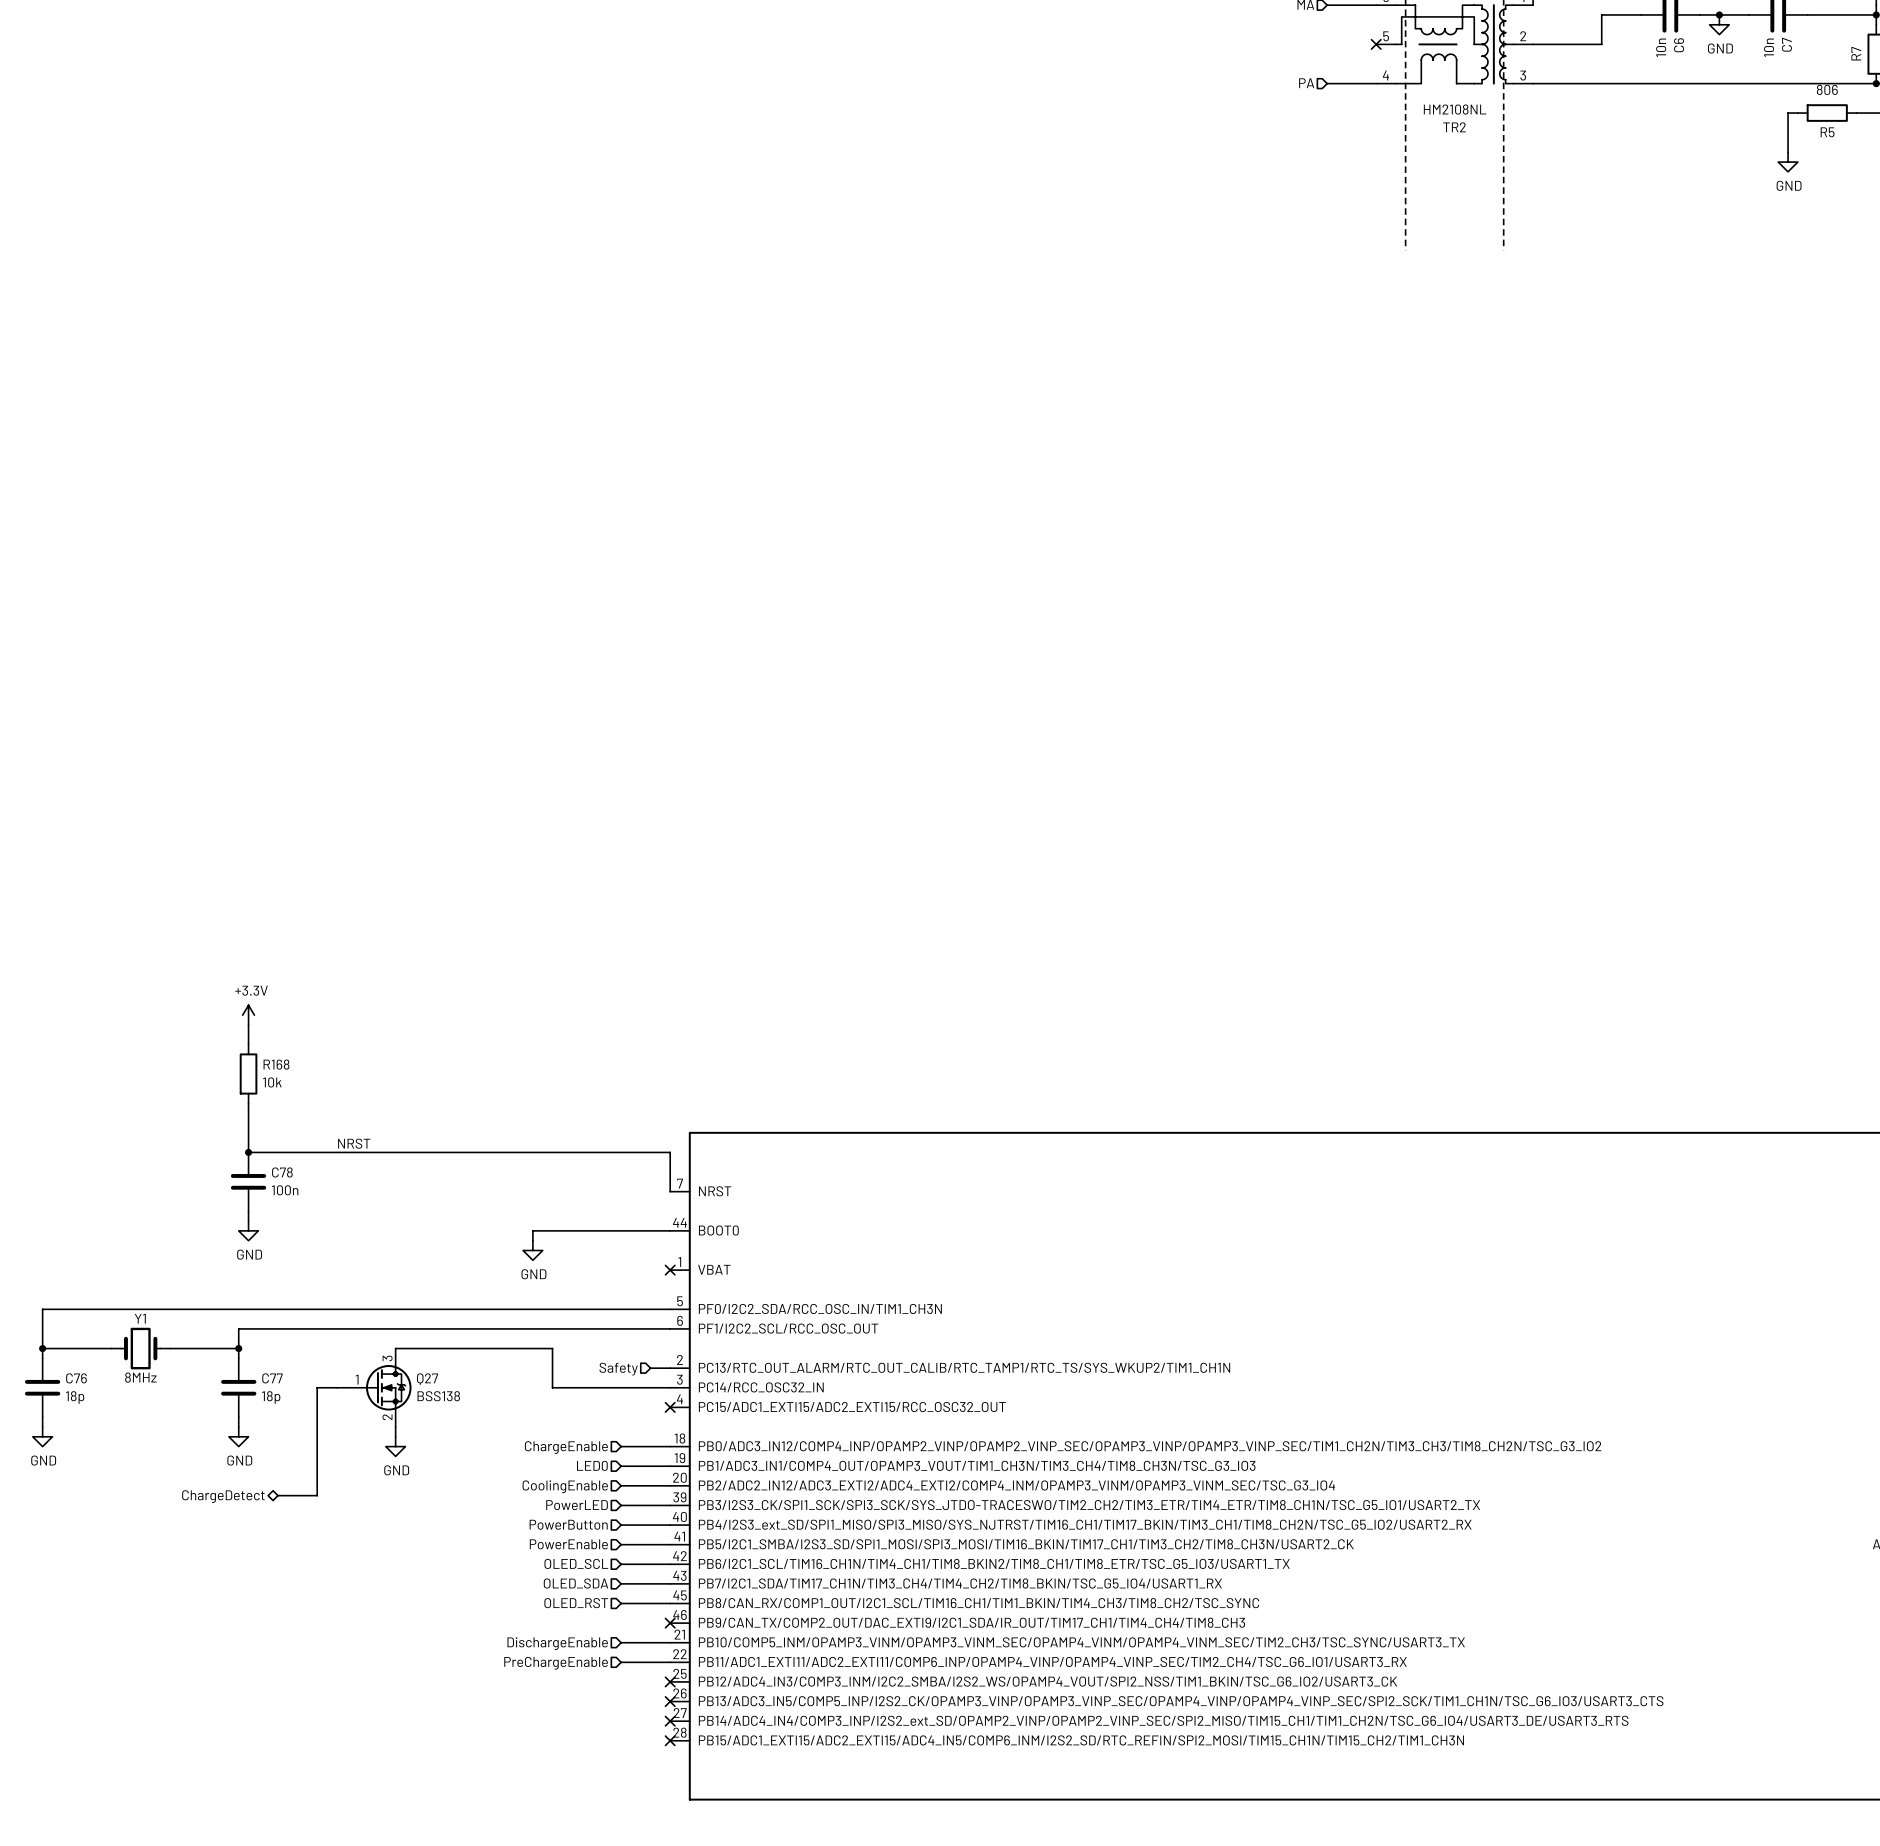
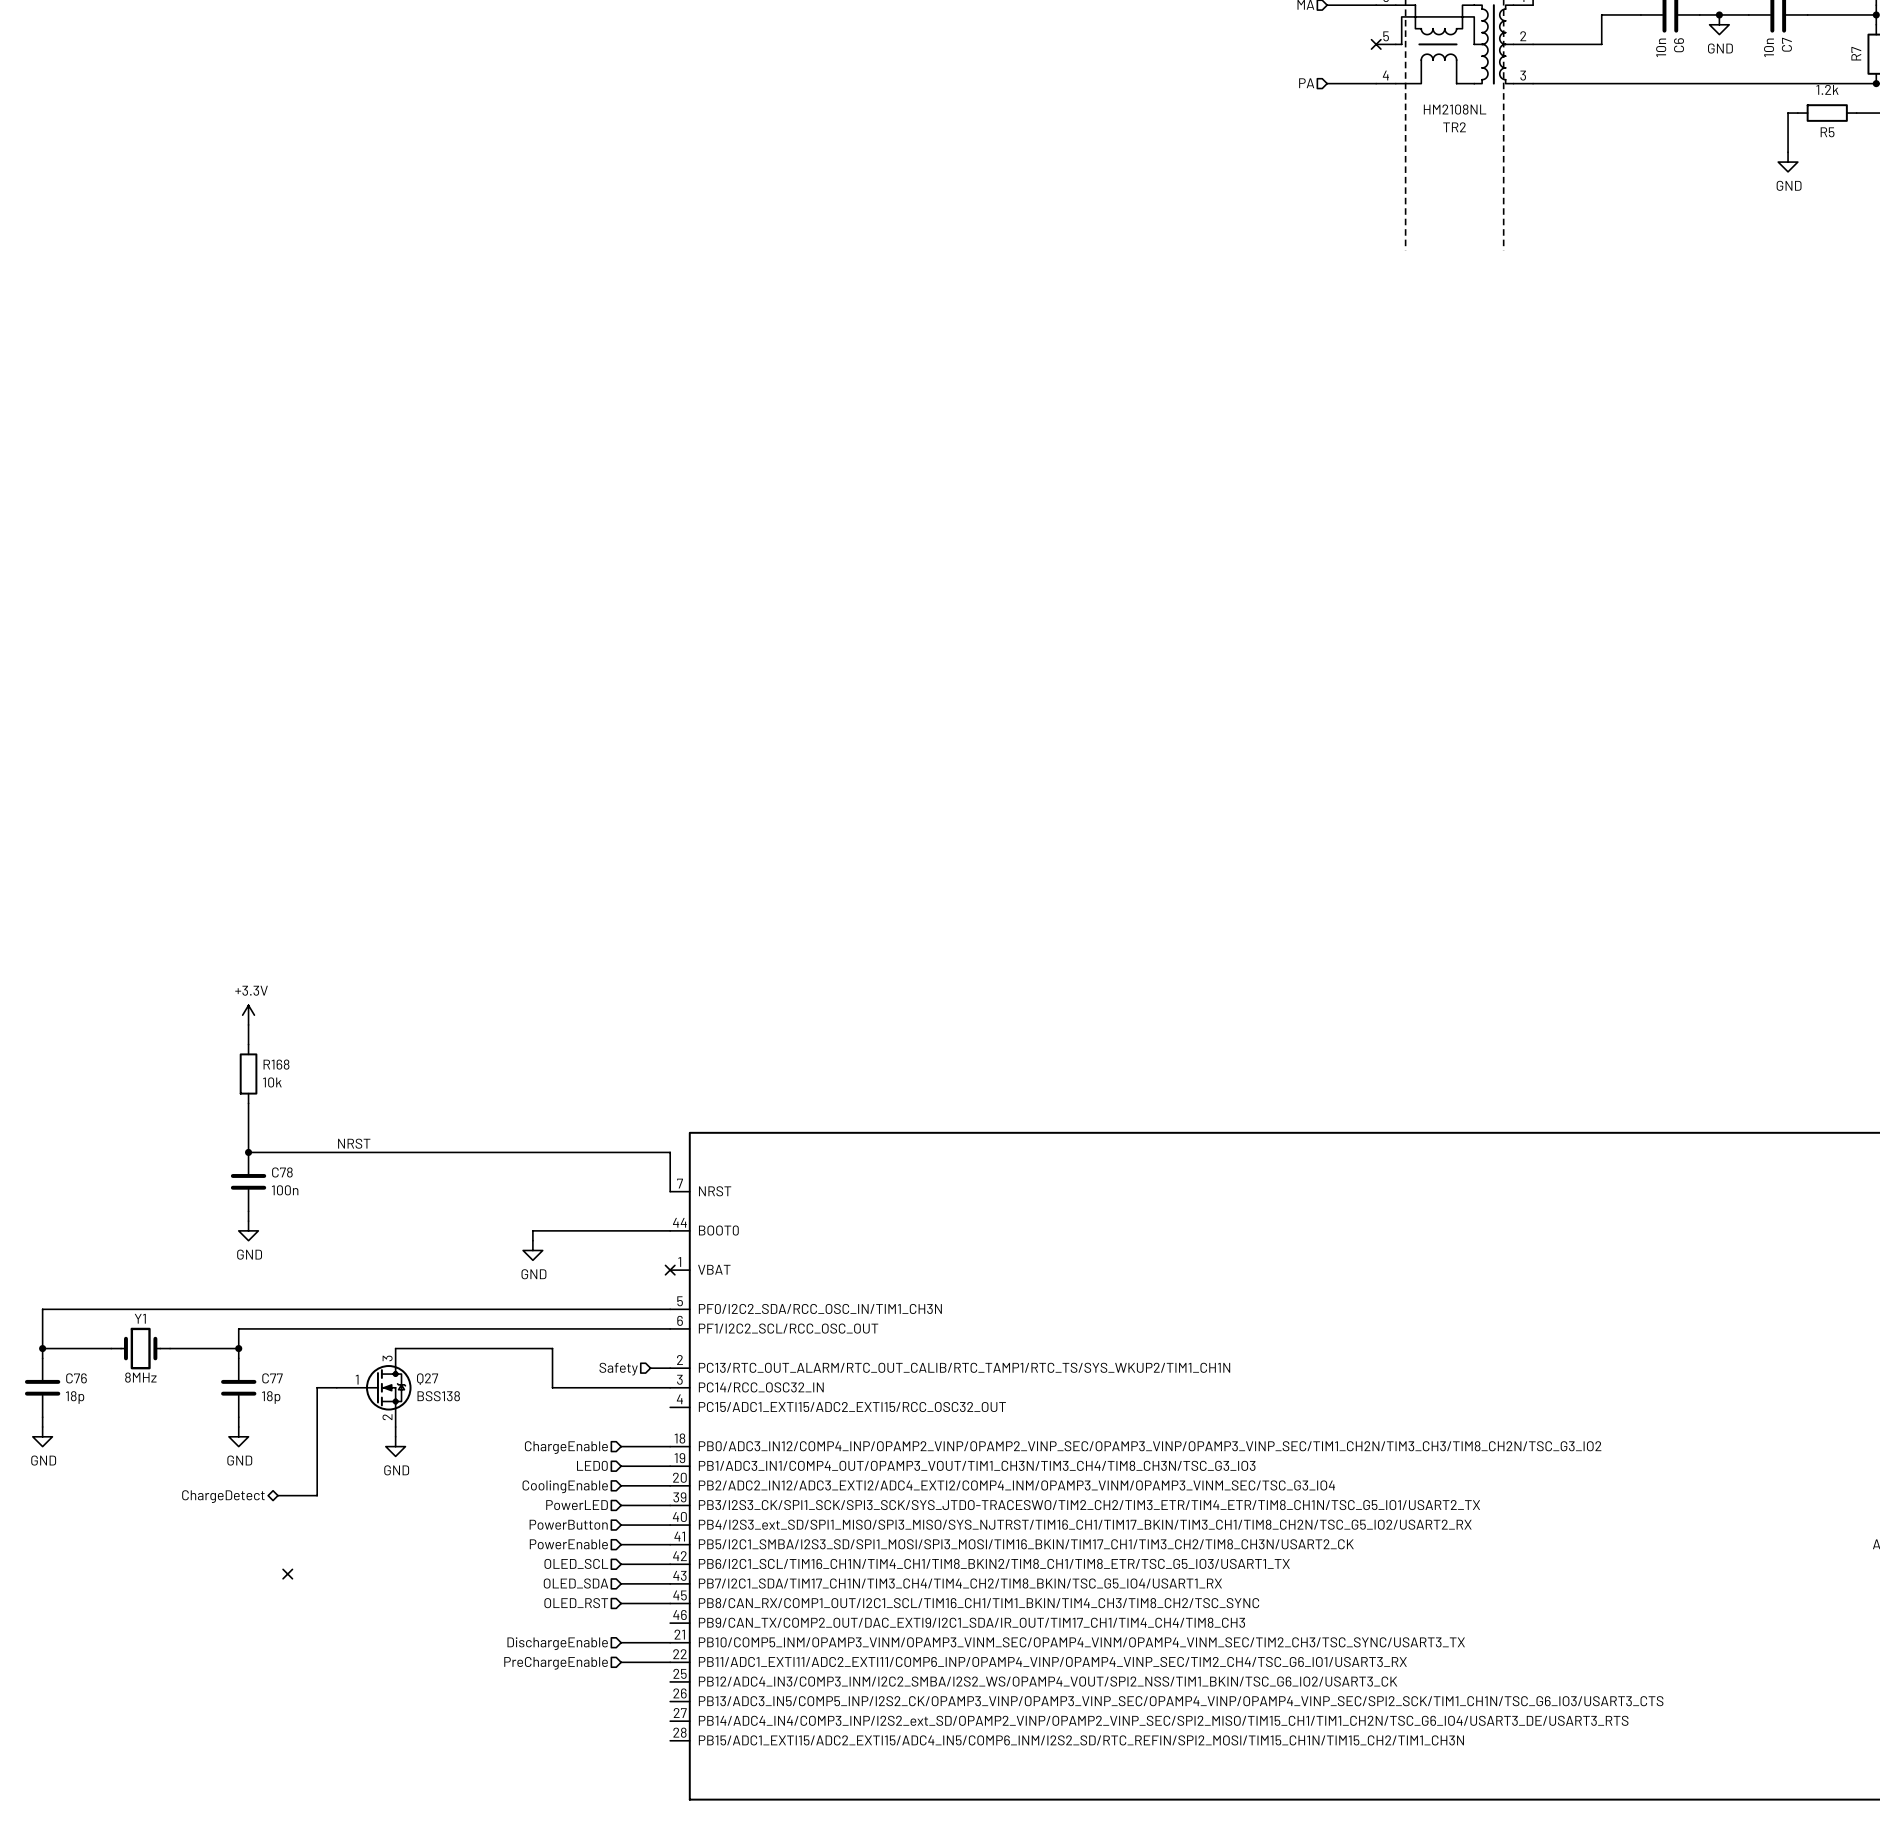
R5 value: 806 (1827, 89) -> 1.2k (1827, 89)
no-connect mark: (670, 1407) -> none
no-connect mark: none -> (287, 1574)
no-connect mark: (670, 1623) -> none
no-connect mark: (670, 1681) -> none
no-connect mark: (670, 1701) -> none
no-connect mark: (670, 1721) -> none
no-connect mark: (670, 1740) -> none

